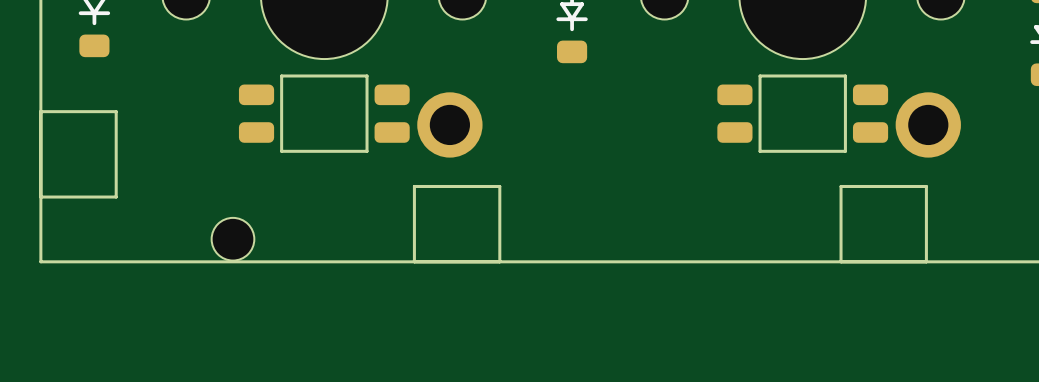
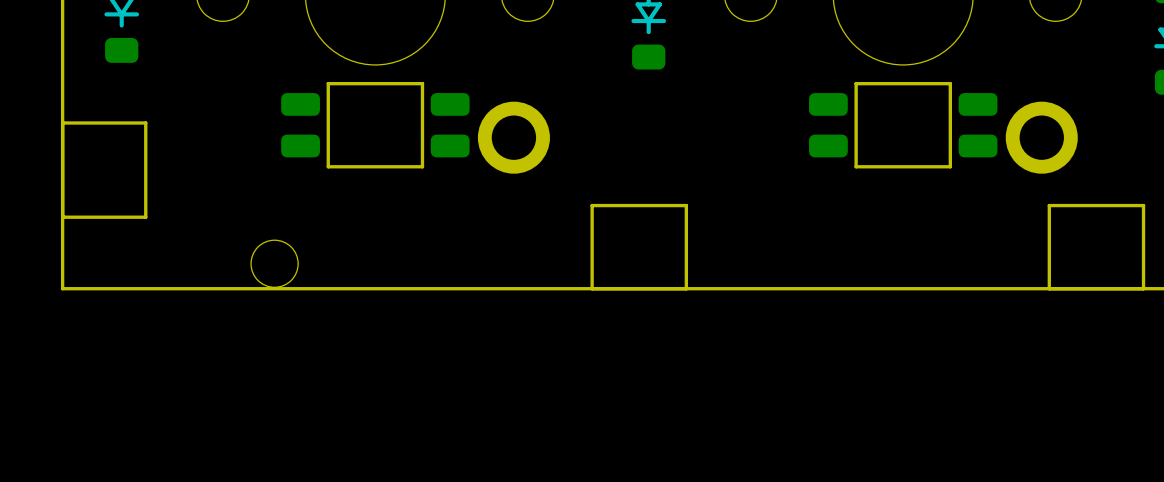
part position: (457, 224) -> (639, 247)
part position: (883, 224) -> (1096, 247)

